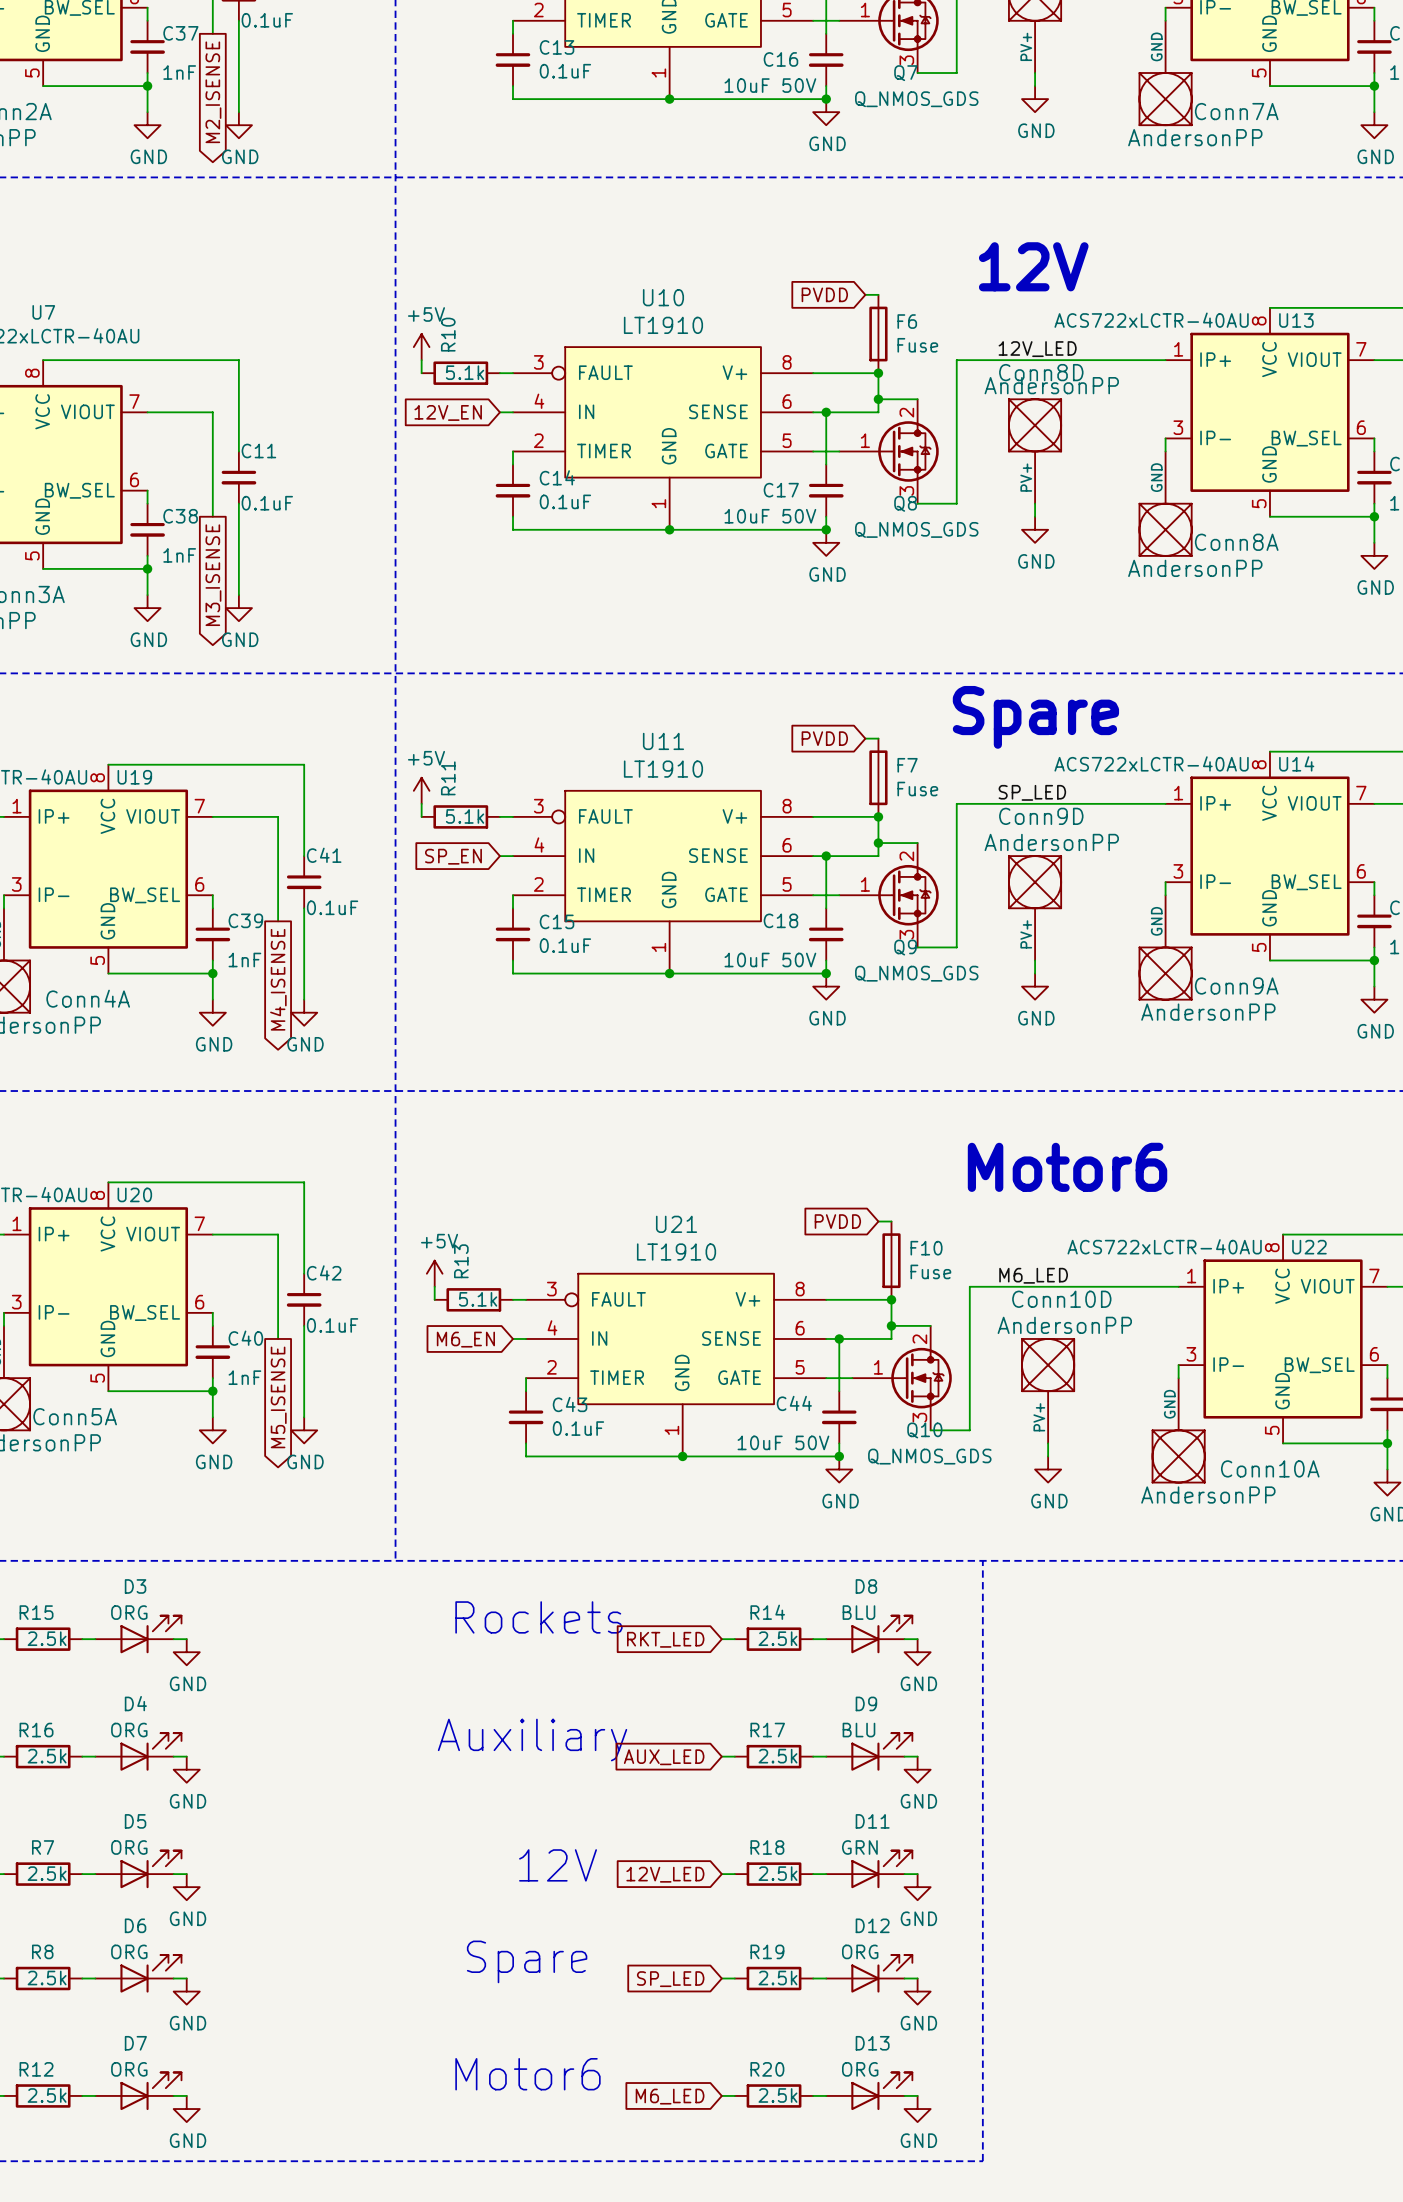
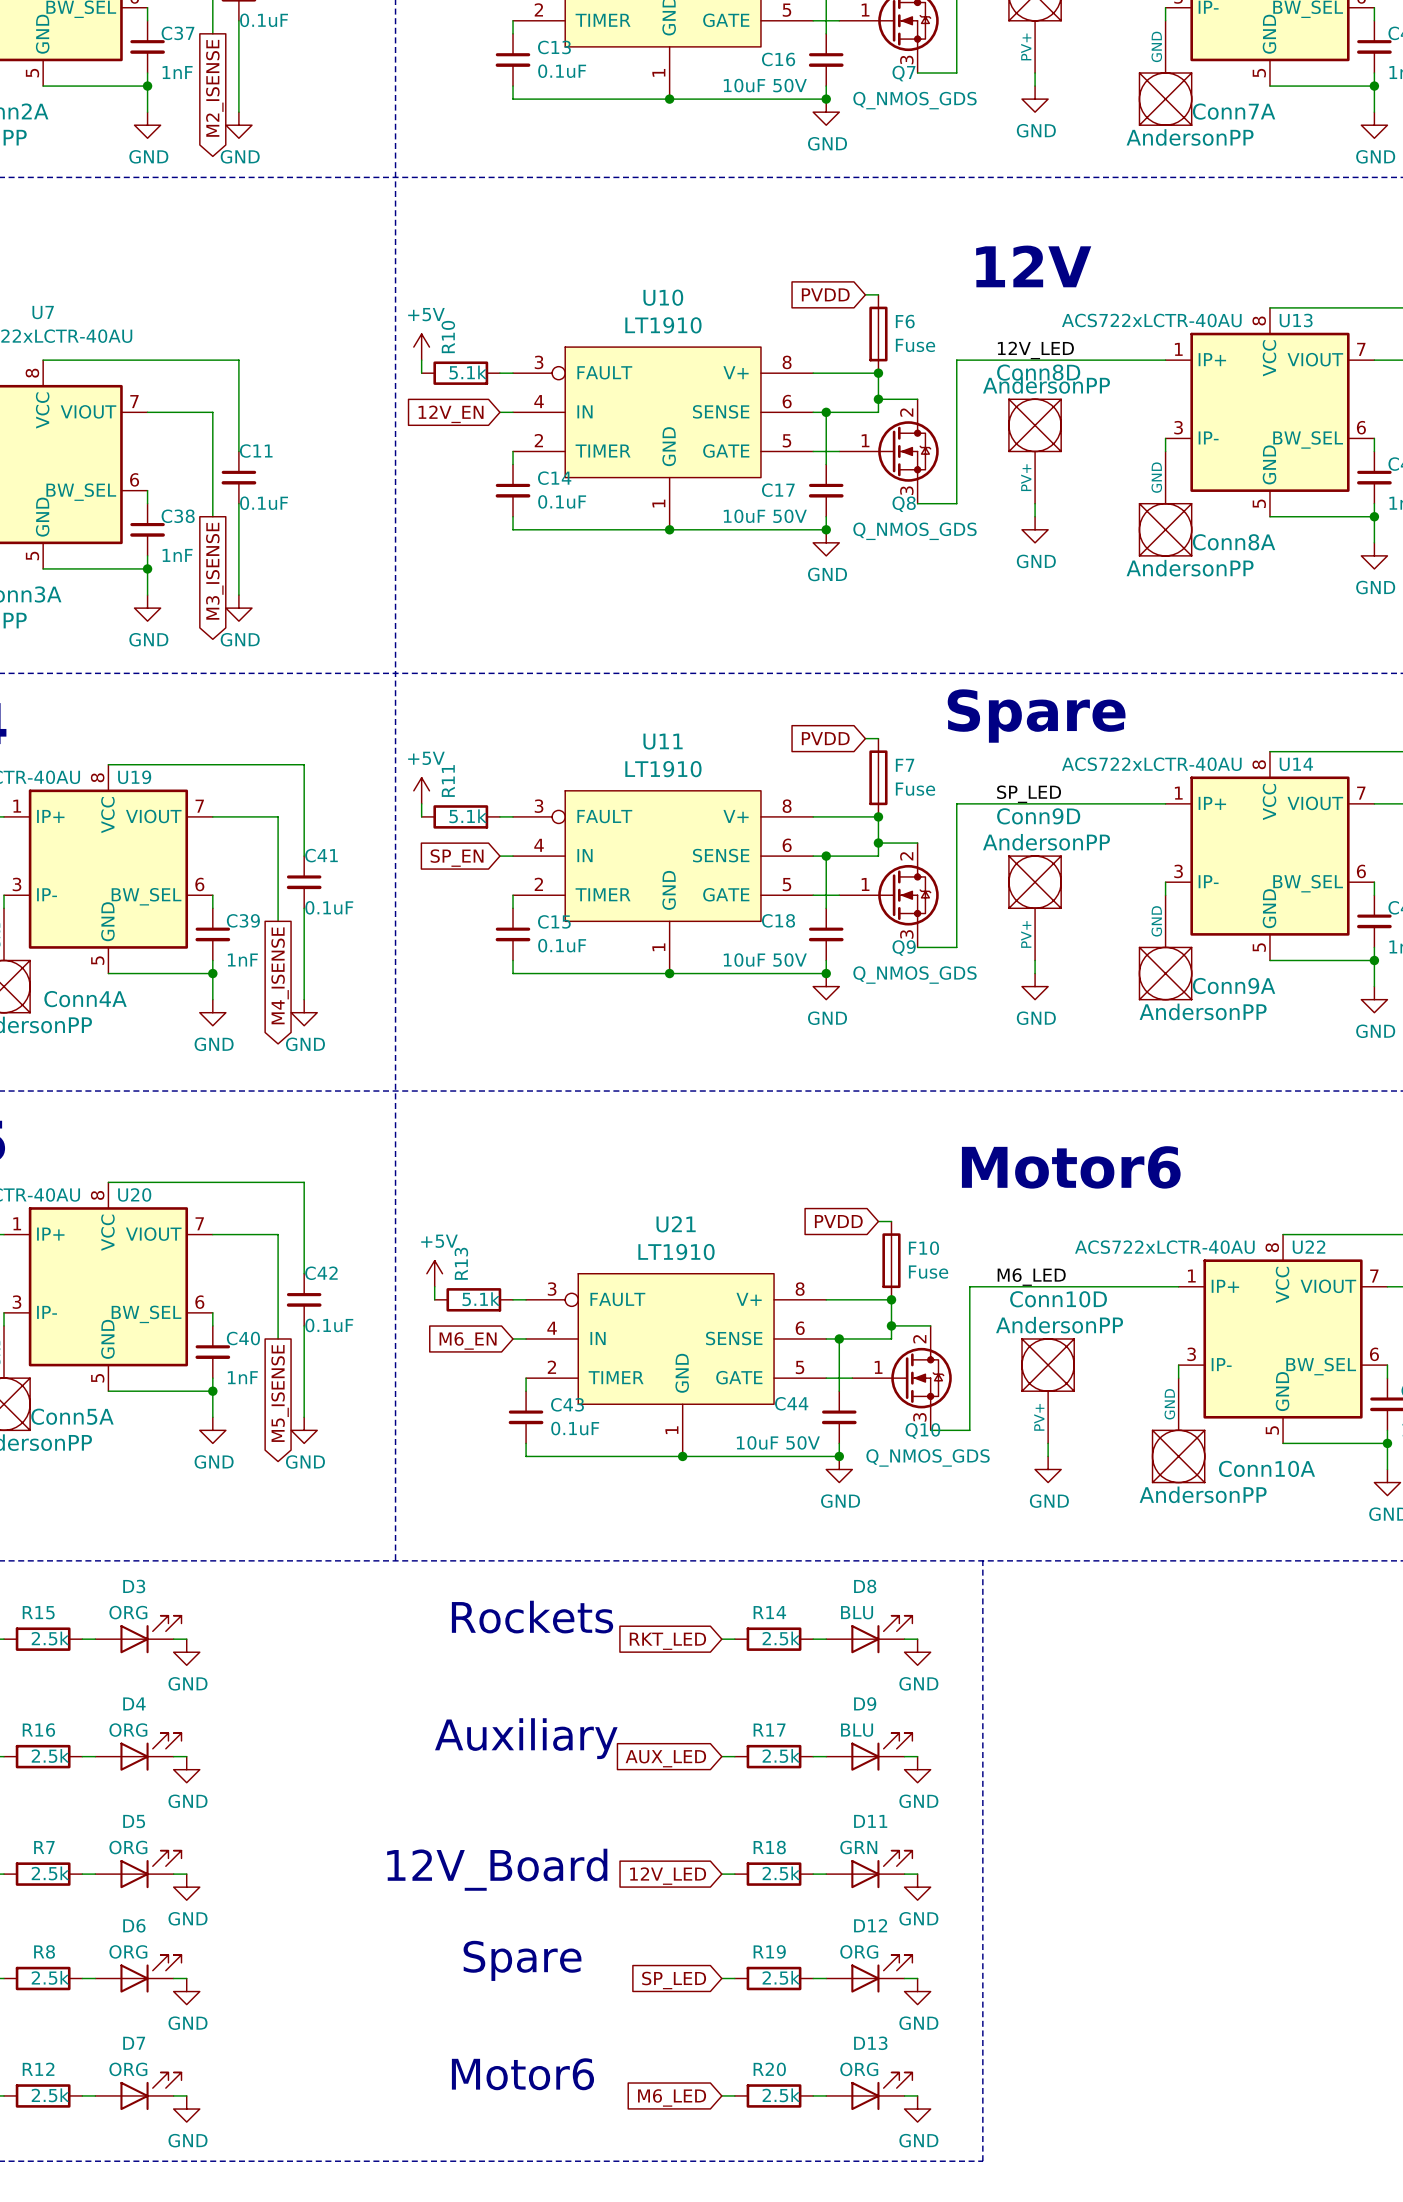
text: 12V (558, 1865) -> none
text: none -> 12V_Board (497, 1869)

